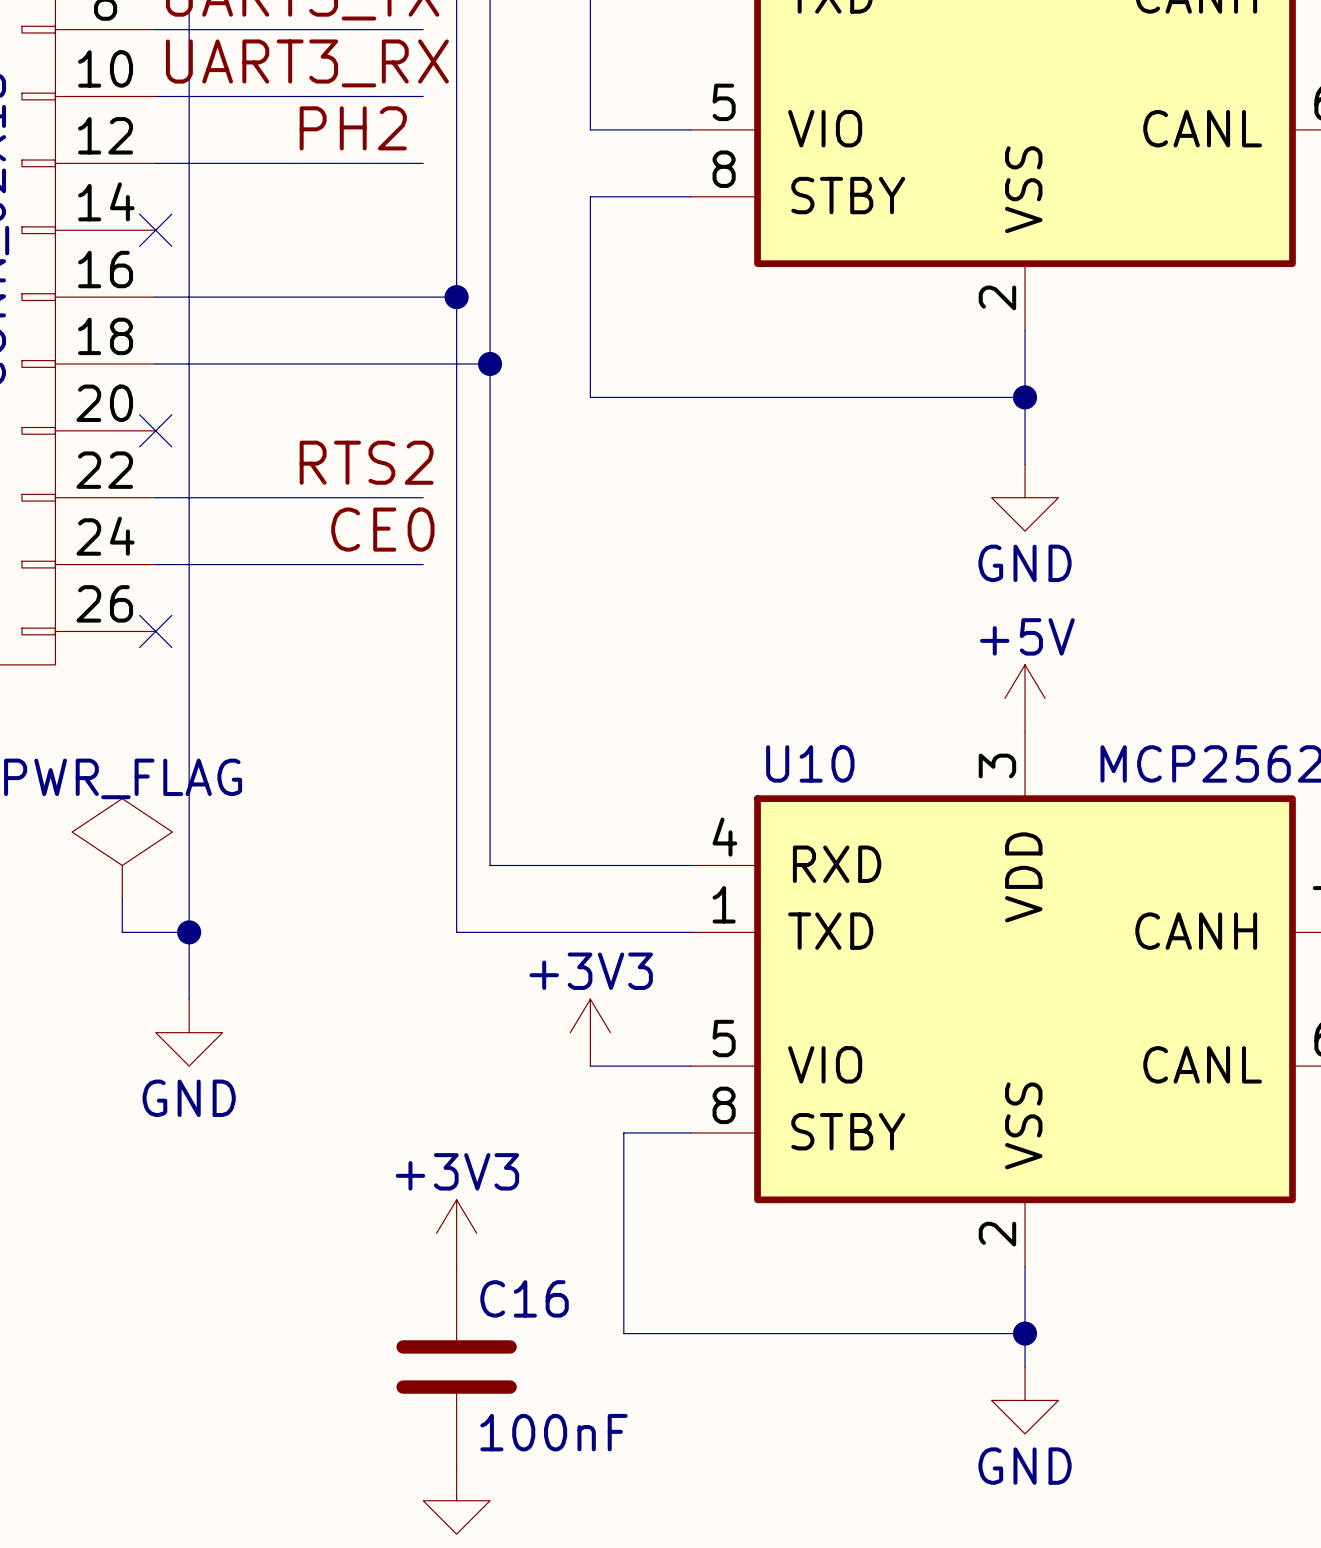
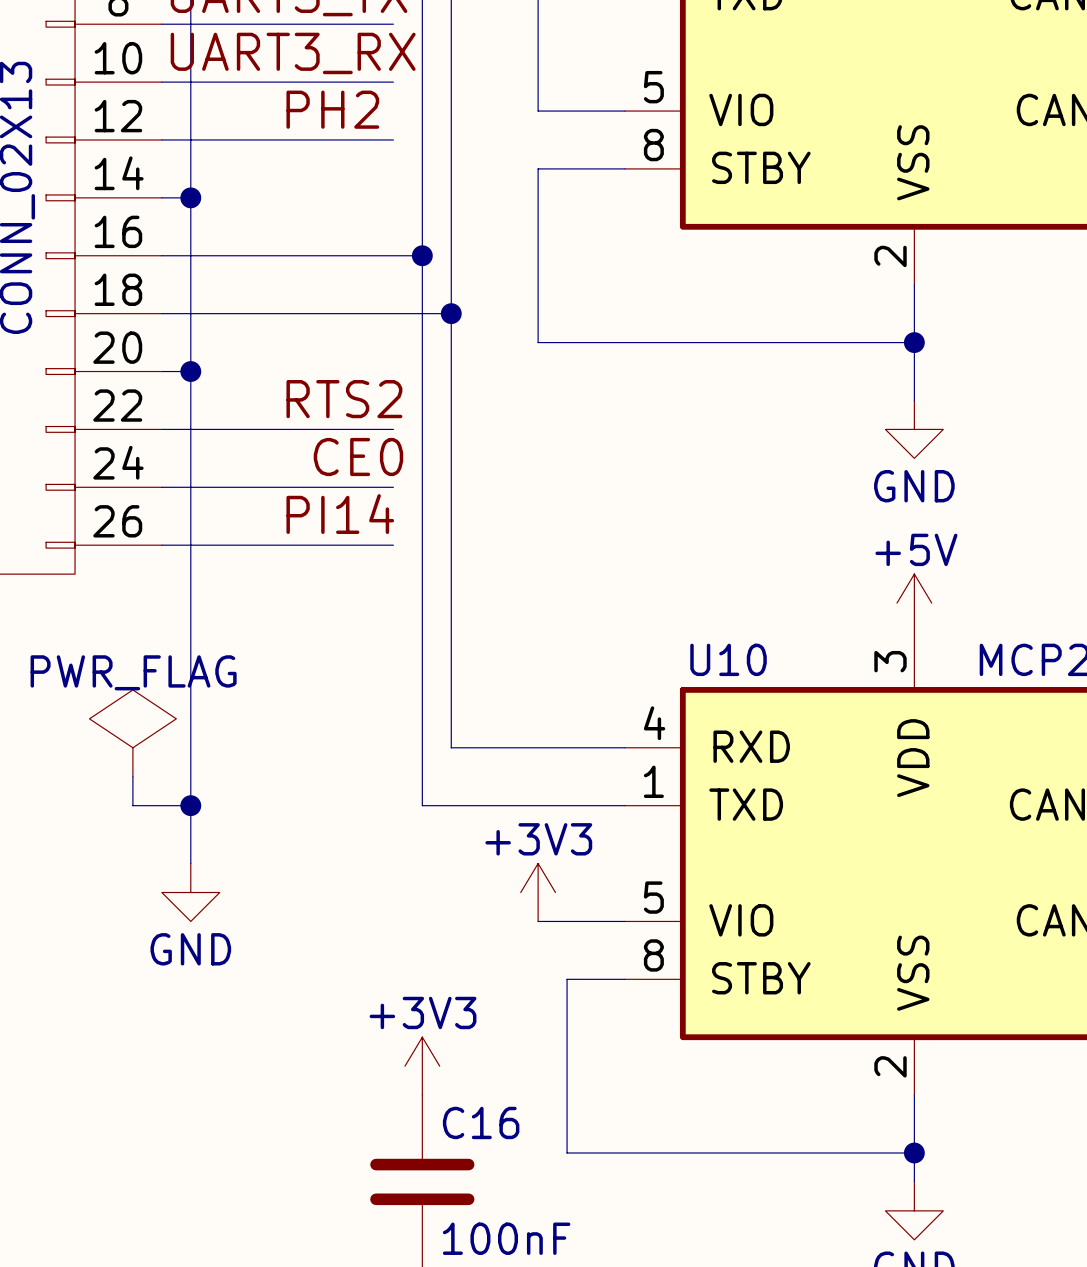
wire: none -> (161, 197) (190, 197)
no-connect mark: (155, 230) -> none
junction: none -> (190, 197)
wire: none -> (161, 371) (190, 371)
no-connect mark: (155, 430) -> none
junction: none -> (190, 371)
label: none -> PI14 (340, 514)
wire: none -> (161, 545) (393, 545)
no-connect mark: (155, 631) -> none

